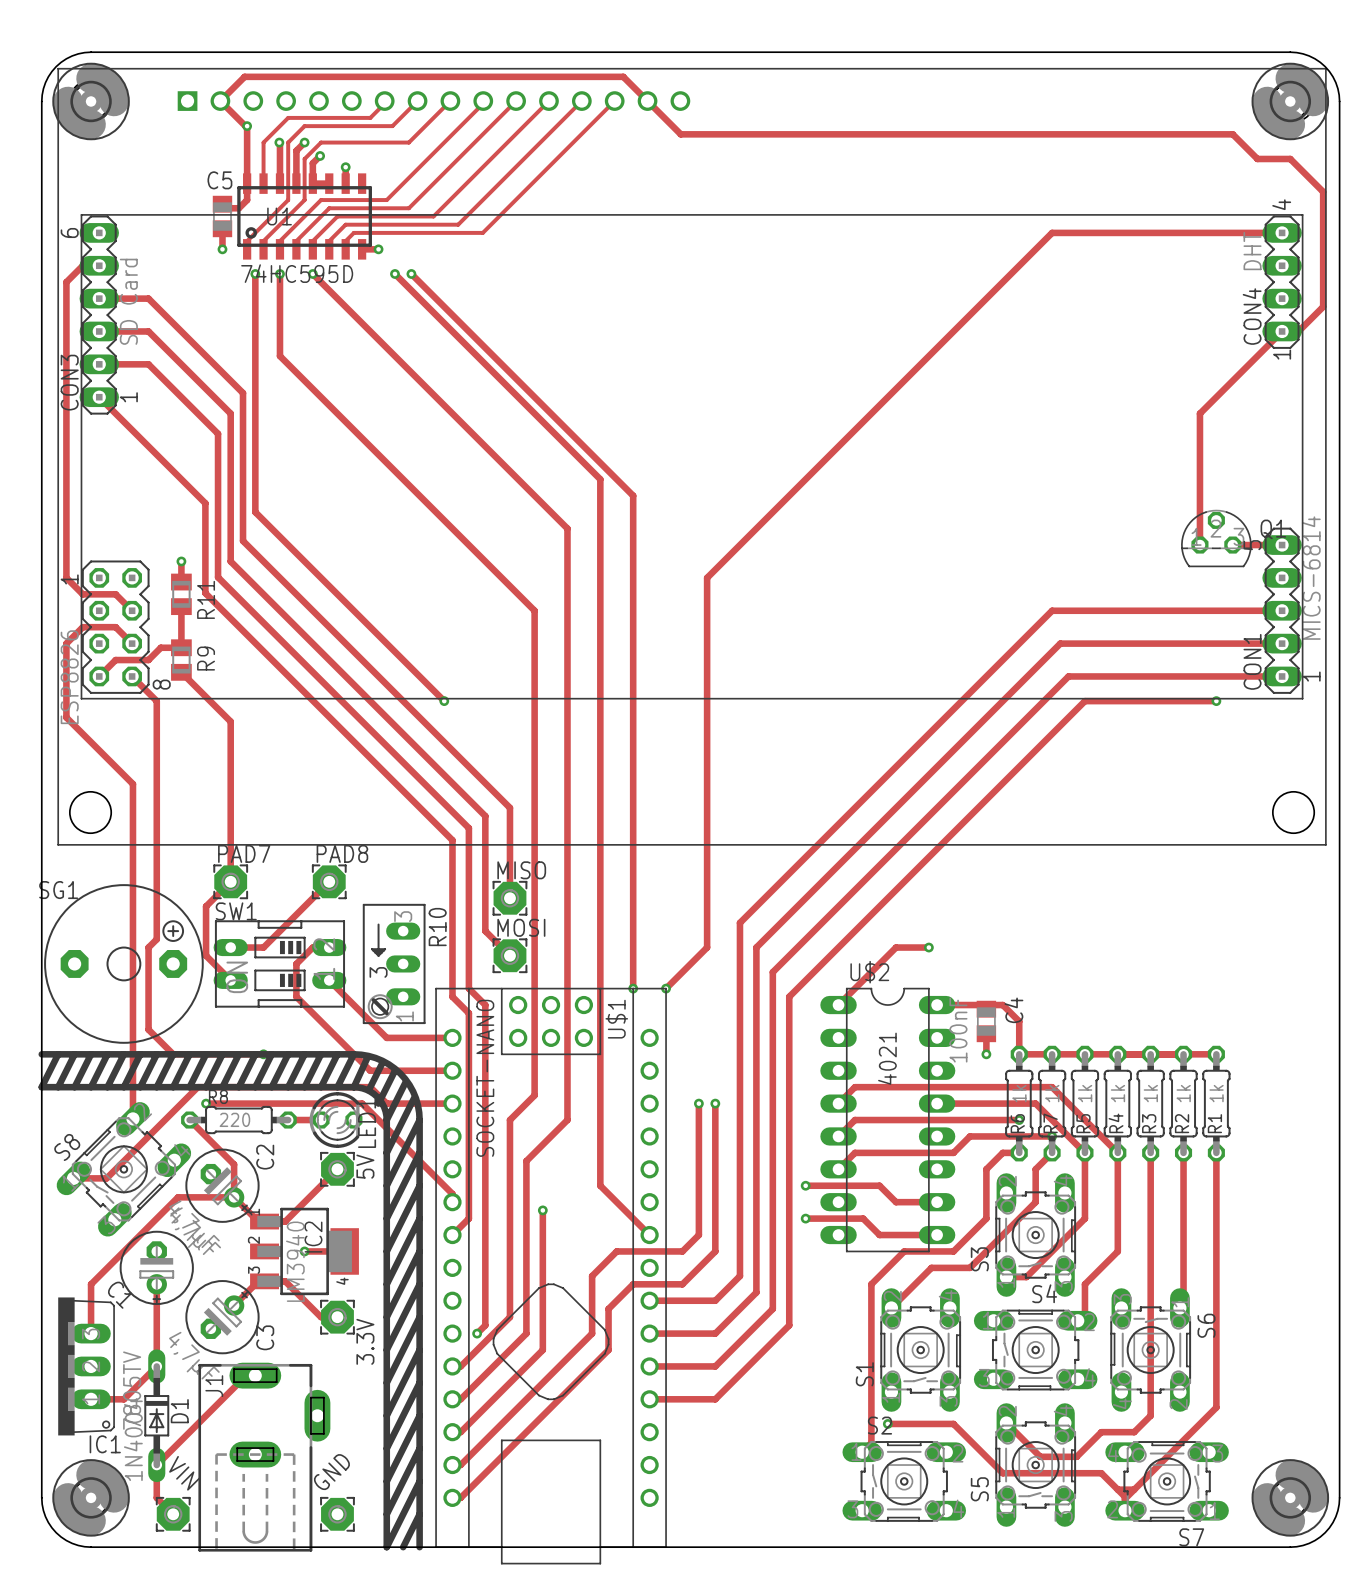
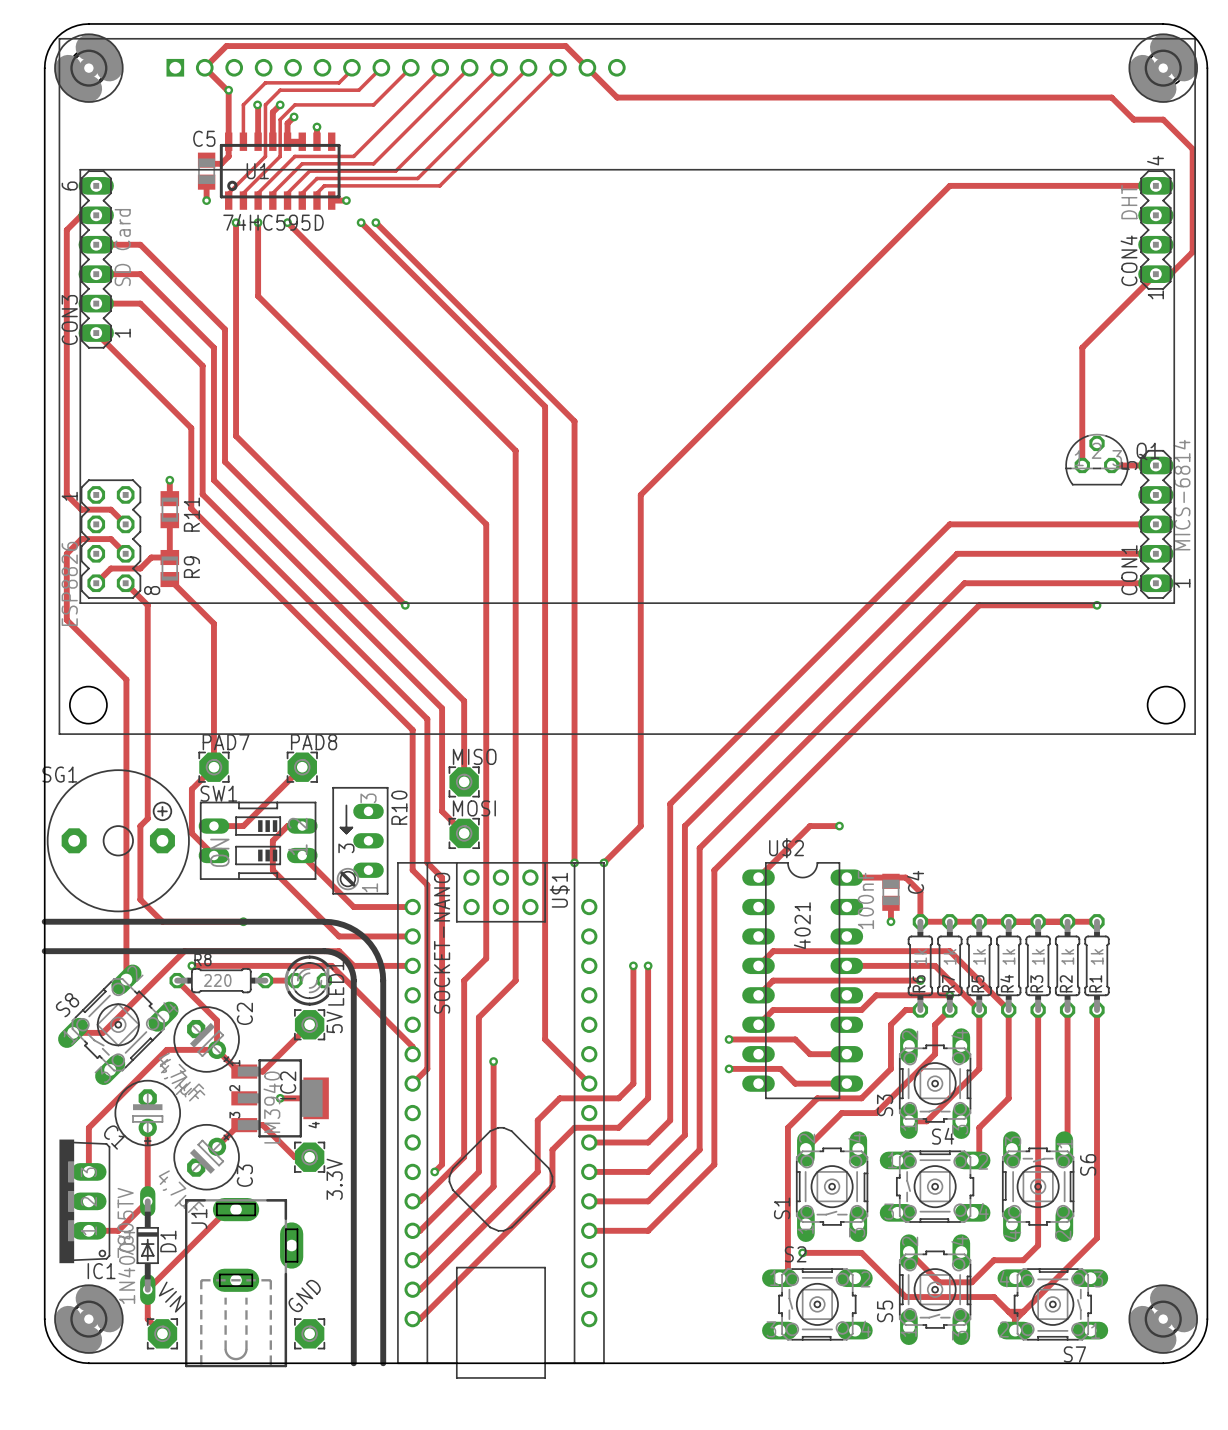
line: (58, 1054) (41, 1087) -> none
line: (74, 1054) (58, 1087) -> none
line: (91, 1054) (74, 1087) -> none
line: (107, 1054) (91, 1087) -> none
line: (123, 1054) (107, 1087) -> none
line: (140, 1054) (123, 1087) -> none
line: (156, 1054) (140, 1087) -> none
line: (173, 1054) (156, 1087) -> none
line: (189, 1054) (173, 1087) -> none
line: (206, 1054) (189, 1087) -> none
line: (222, 1054) (206, 1087) -> none
line: (238, 1054) (222, 1087) -> none
line: (255, 1054) (238, 1087) -> none
line: (271, 1054) (255, 1087) -> none
line: (288, 1054) (271, 1087) -> none
line: (304, 1054) (288, 1087) -> none
line: (321, 1054) (304, 1087) -> none
line: (337, 1054) (321, 1087) -> none
line: (353, 1054) (337, 1087) -> none
line: (367, 1056) (353, 1087) -> none
line: (382, 1062) (370, 1087) -> none
line: (394, 1070) (378, 1103) -> none
line: (405, 1082) (386, 1120) -> none
line: (413, 1098) (386, 1152) -> none
line: (419, 1120) (386, 1185) -> none
line: (419, 1152) (386, 1218) -> none
line: (419, 1185) (386, 1251) -> none
line: (419, 1218) (386, 1284) -> none
line: (419, 1251) (386, 1317) -> none
line: (419, 1284) (386, 1350) -> none
line: (419, 1317) (386, 1382) -> none
line: (419, 1350) (386, 1415) -> none
line: (419, 1382) (386, 1448) -> none
line: (419, 1415) (386, 1481) -> none
line: (419, 1448) (386, 1514) -> none
line: (419, 1481) (386, 1547) -> none
line: (419, 1514) (403, 1547) -> none

